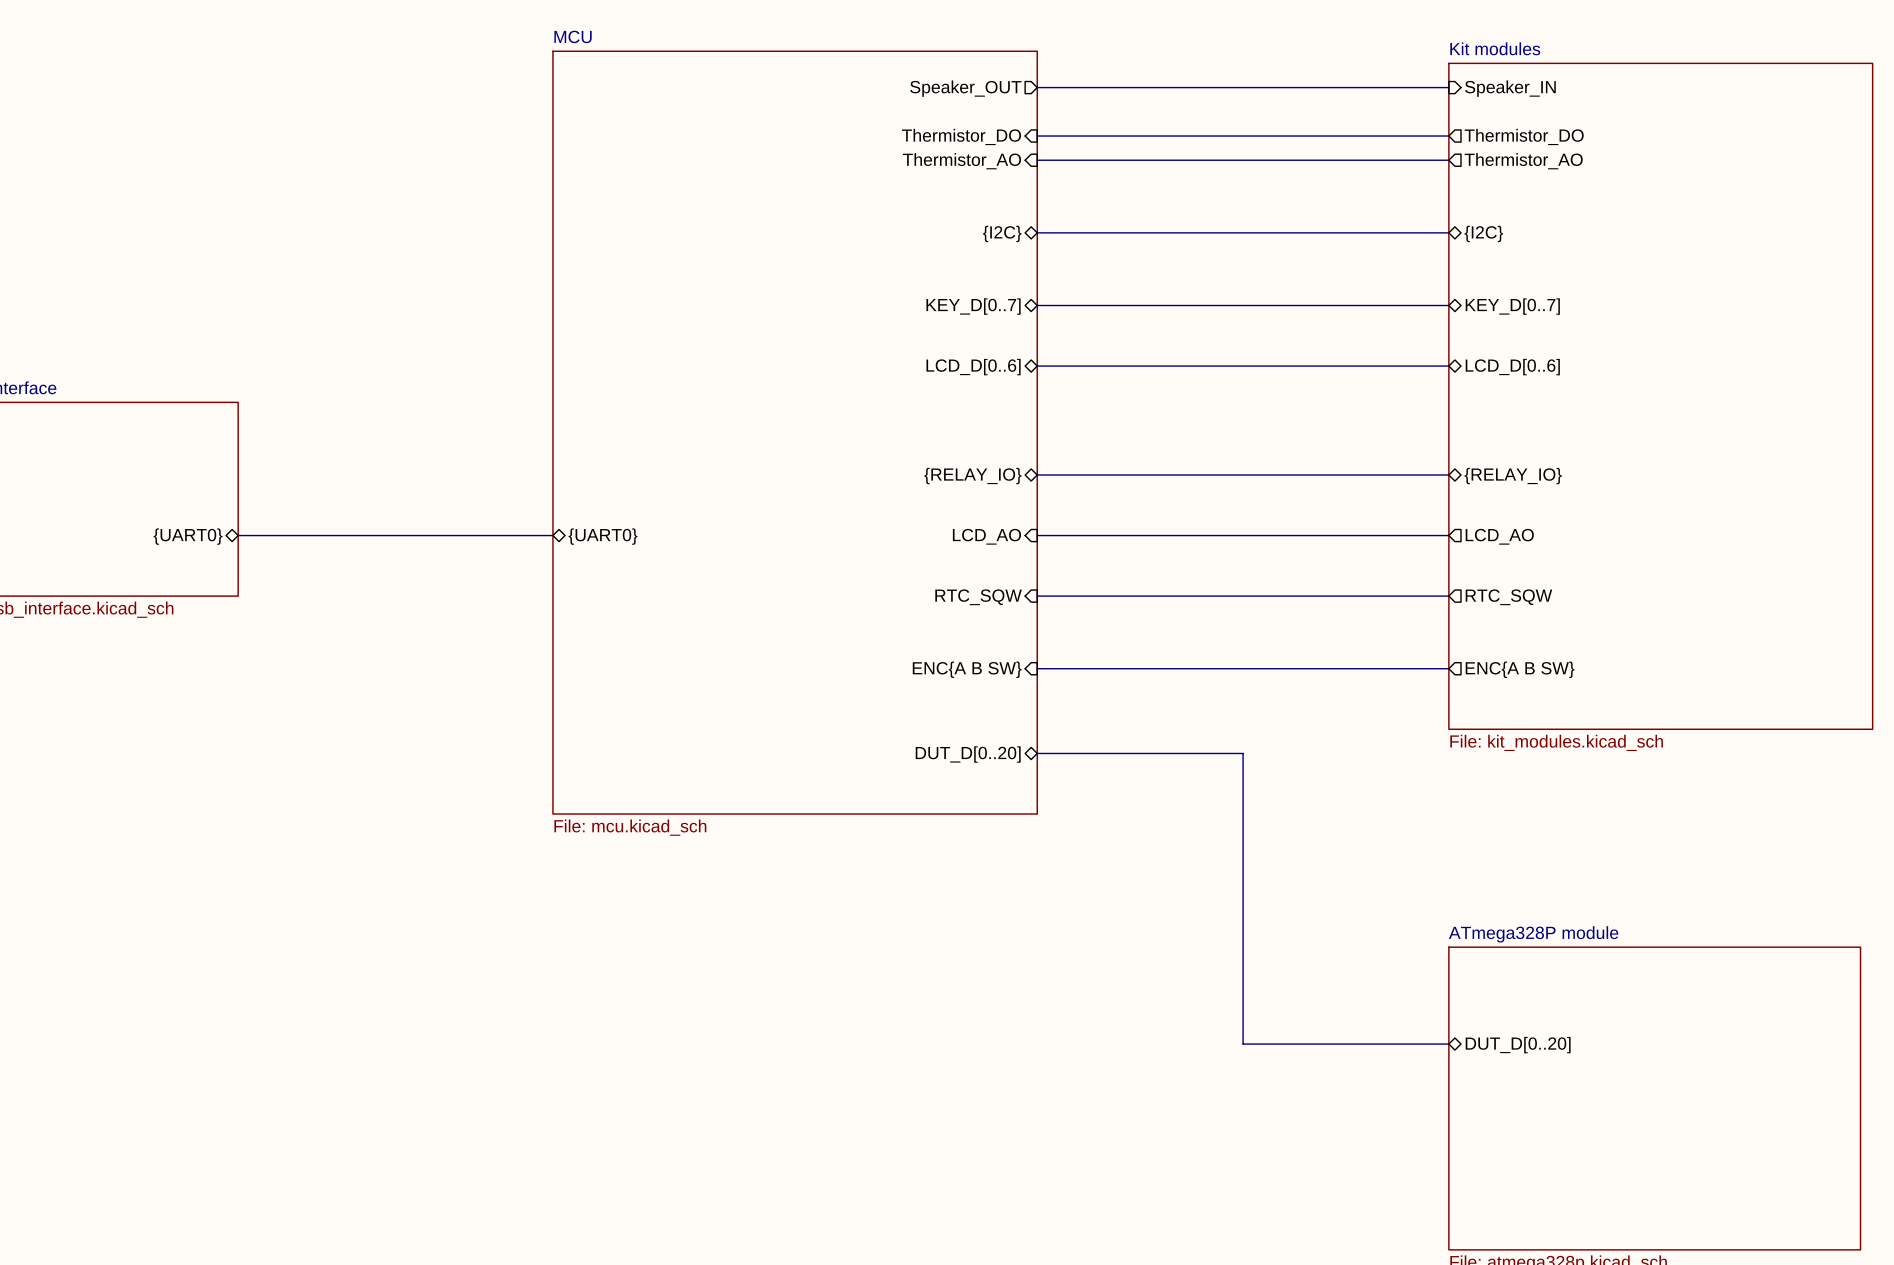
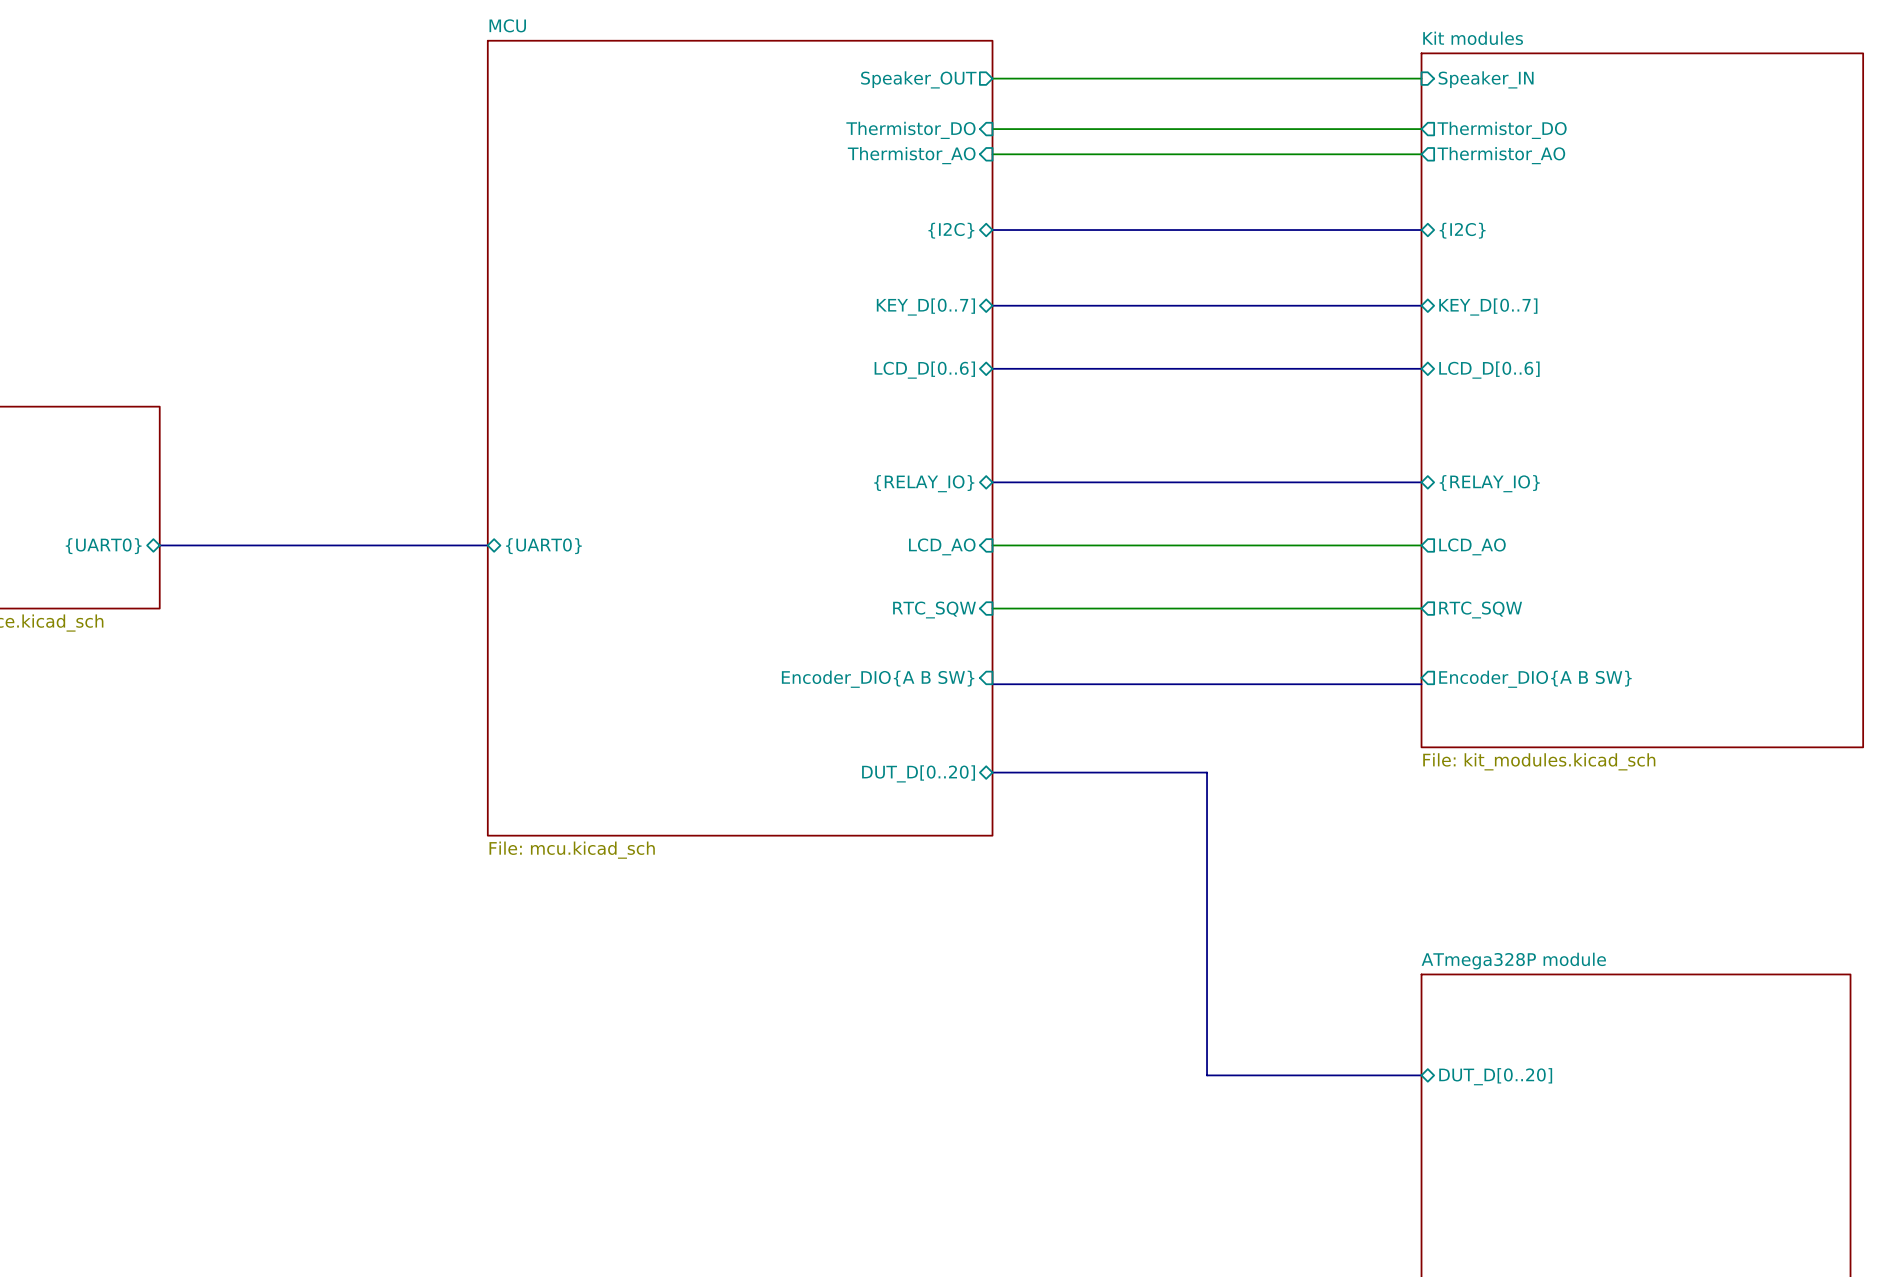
sheet pin: ENC{A B SW} (967, 669) -> Encoder_DIO{A B SW} (878, 679)
sheet pin: ENC{A B SW} (1520, 669) -> Encoder_DIO{A B SW} (1535, 679)

